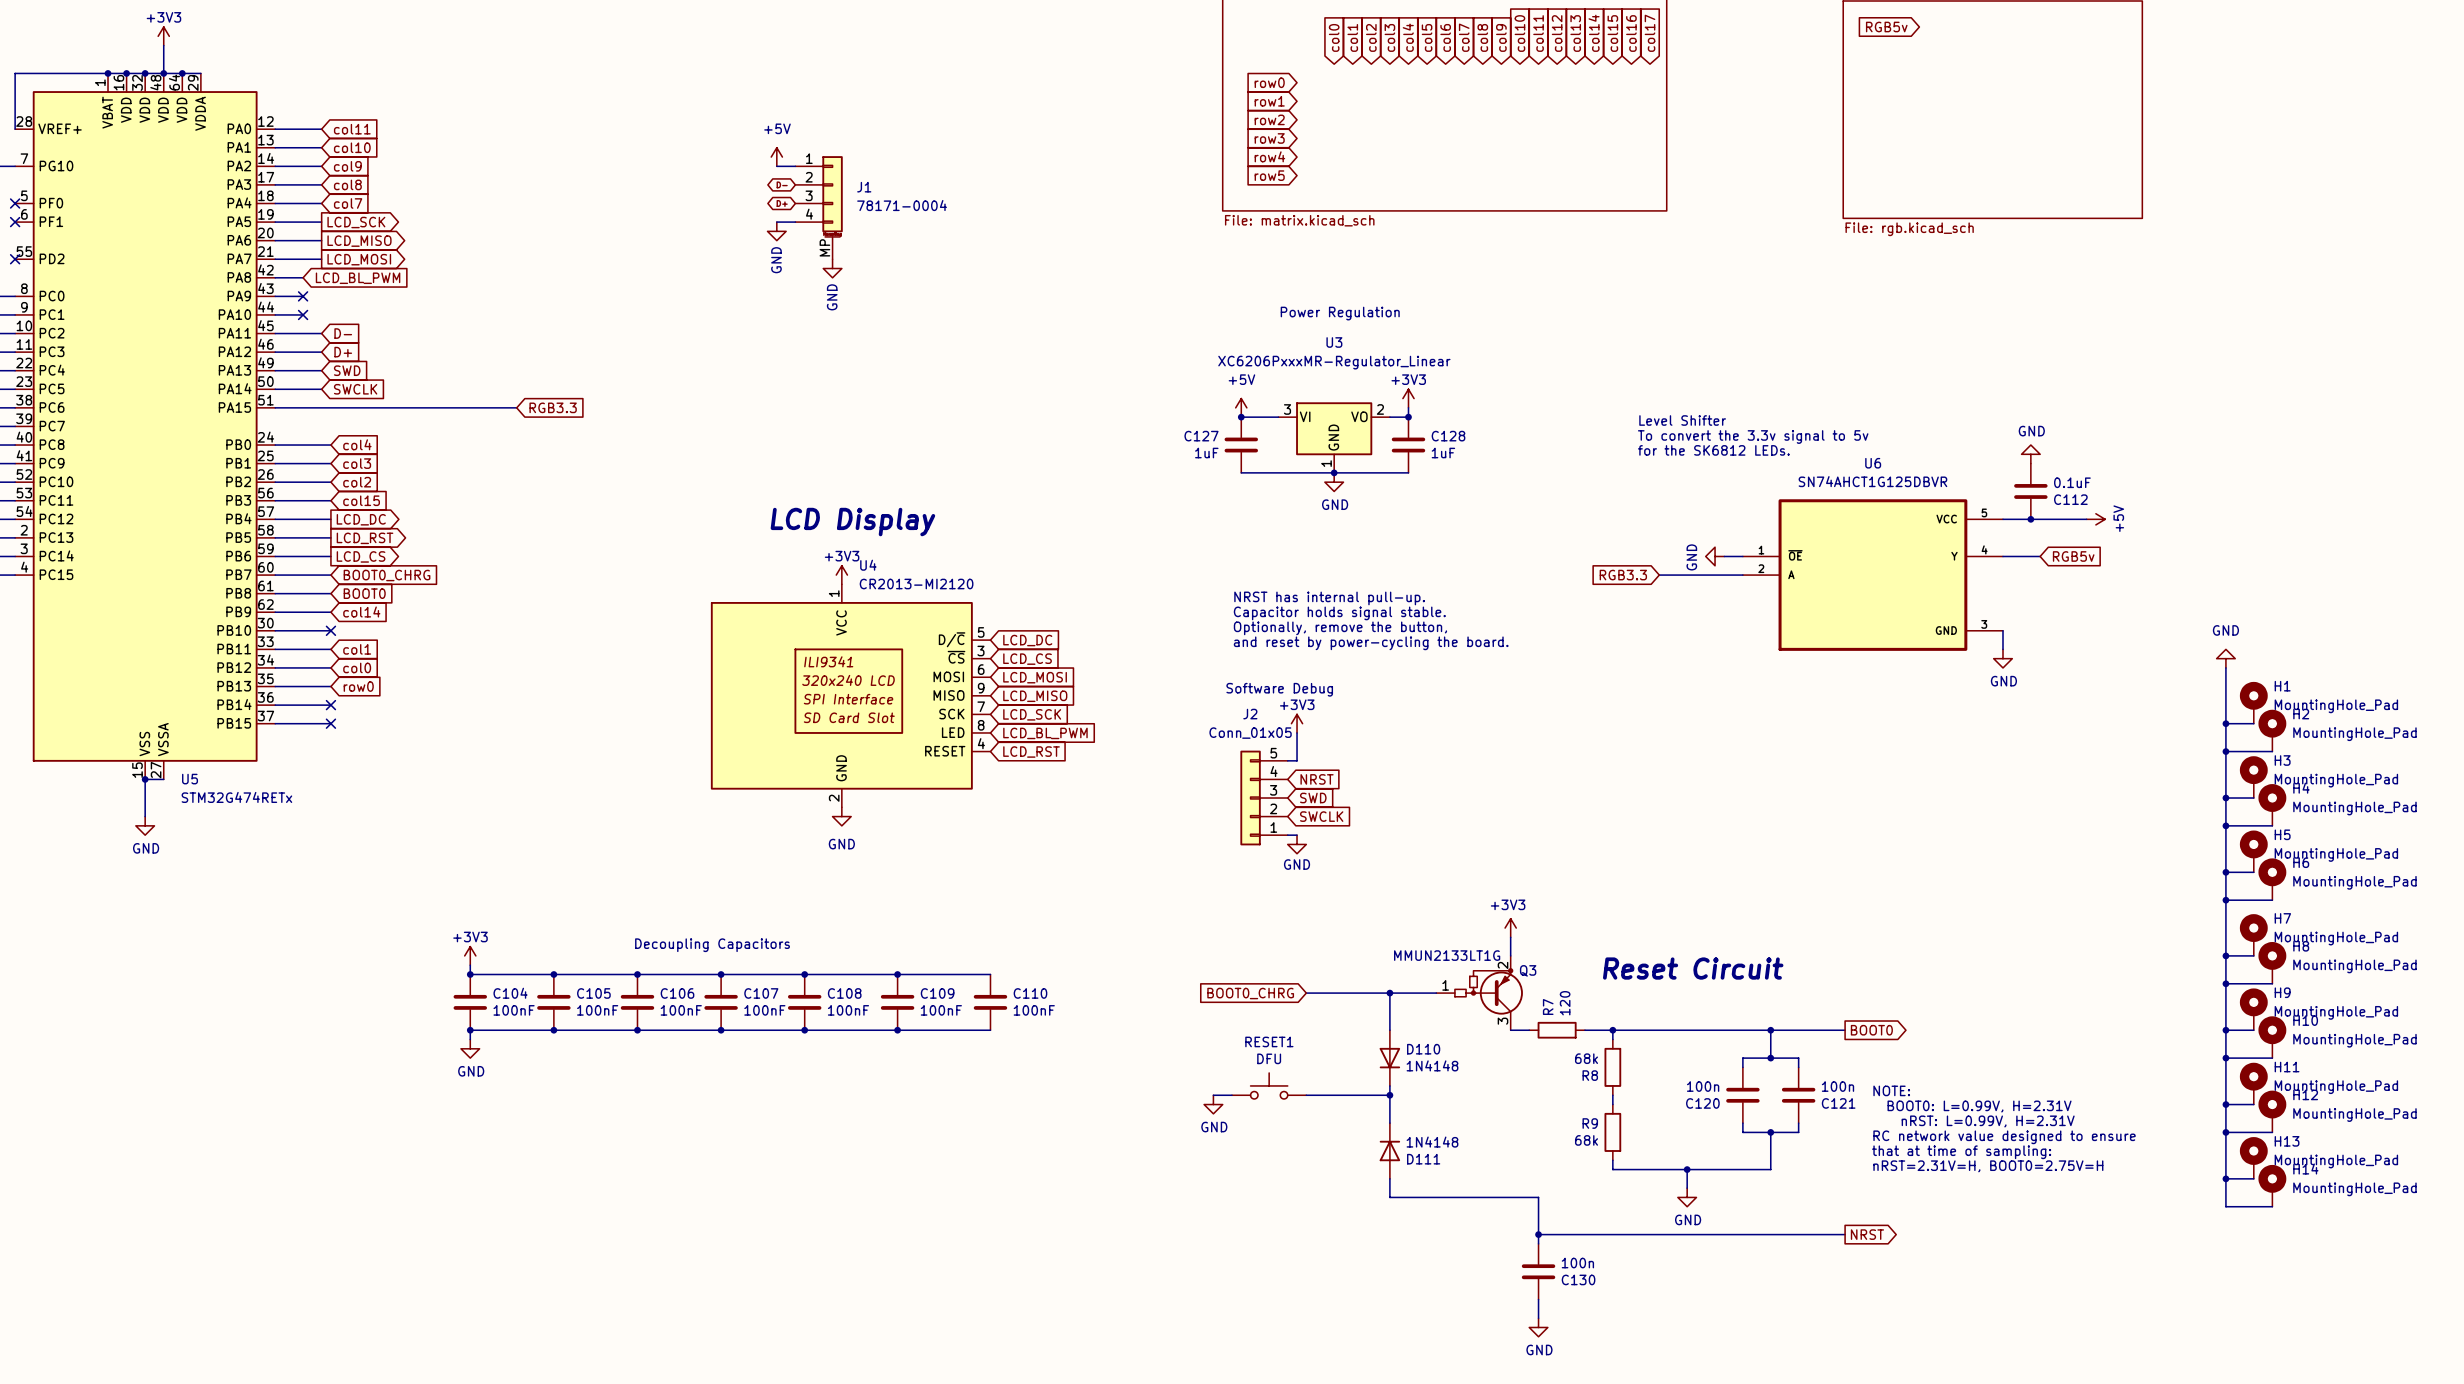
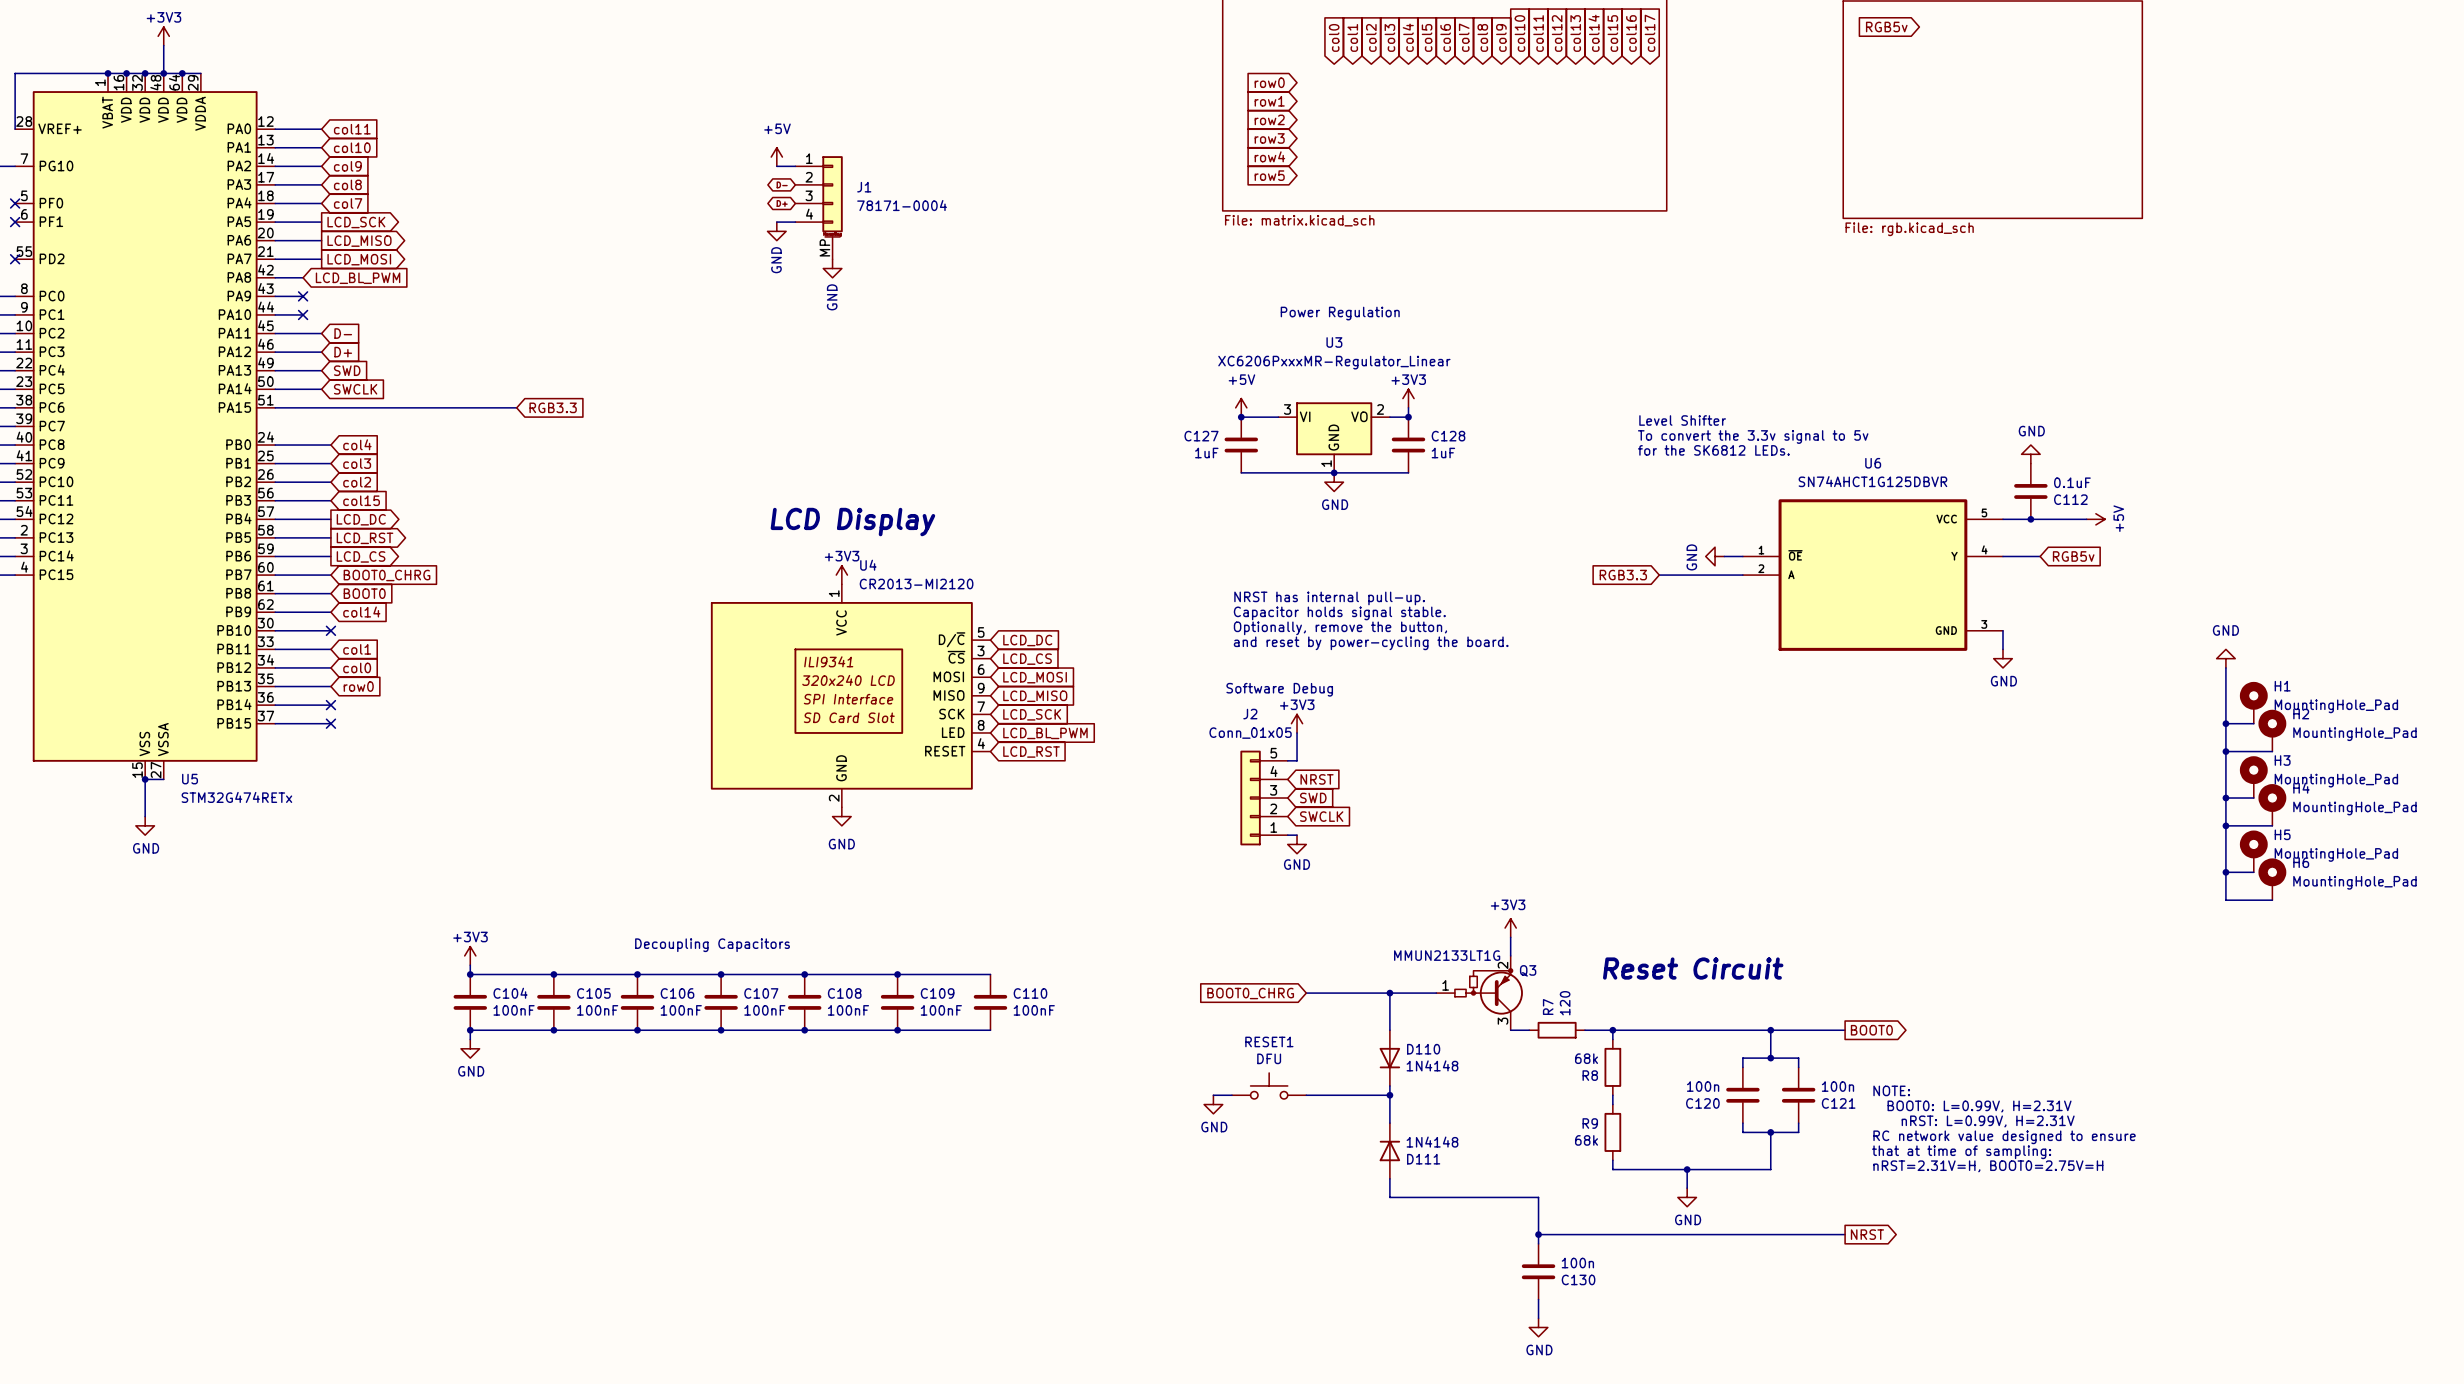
wire: (2225, 900) (2225, 1206) (2272, 1206) -> none
junction: (2225, 900) -> none
H7: MountingHole_Pad (2253, 935) -> none
wire: (2225, 955) (2253, 955) -> none
junction: (2225, 955) -> none
H8: MountingHole_Pad (2272, 962) -> none
wire: (2225, 983) (2272, 983) -> none
junction: (2225, 983) -> none
H9: MountingHole_Pad (2253, 1009) -> none
wire: (2225, 1030) (2253, 1030) -> none
junction: (2225, 1030) -> none
H10: MountingHole_Pad (2272, 1037) -> none
wire: (2225, 1058) (2272, 1058) -> none
junction: (2225, 1058) -> none
H11: MountingHole_Pad (2253, 1083) -> none
wire: (2225, 1104) (2253, 1104) -> none
junction: (2225, 1104) -> none
H12: MountingHole_Pad (2272, 1111) -> none
wire: (2225, 1132) (2272, 1132) -> none
junction: (2225, 1132) -> none
H13: MountingHole_Pad (2253, 1157) -> none
wire: (2225, 1178) (2253, 1178) -> none
junction: (2225, 1178) -> none
H14: MountingHole_Pad (2272, 1185) -> none

